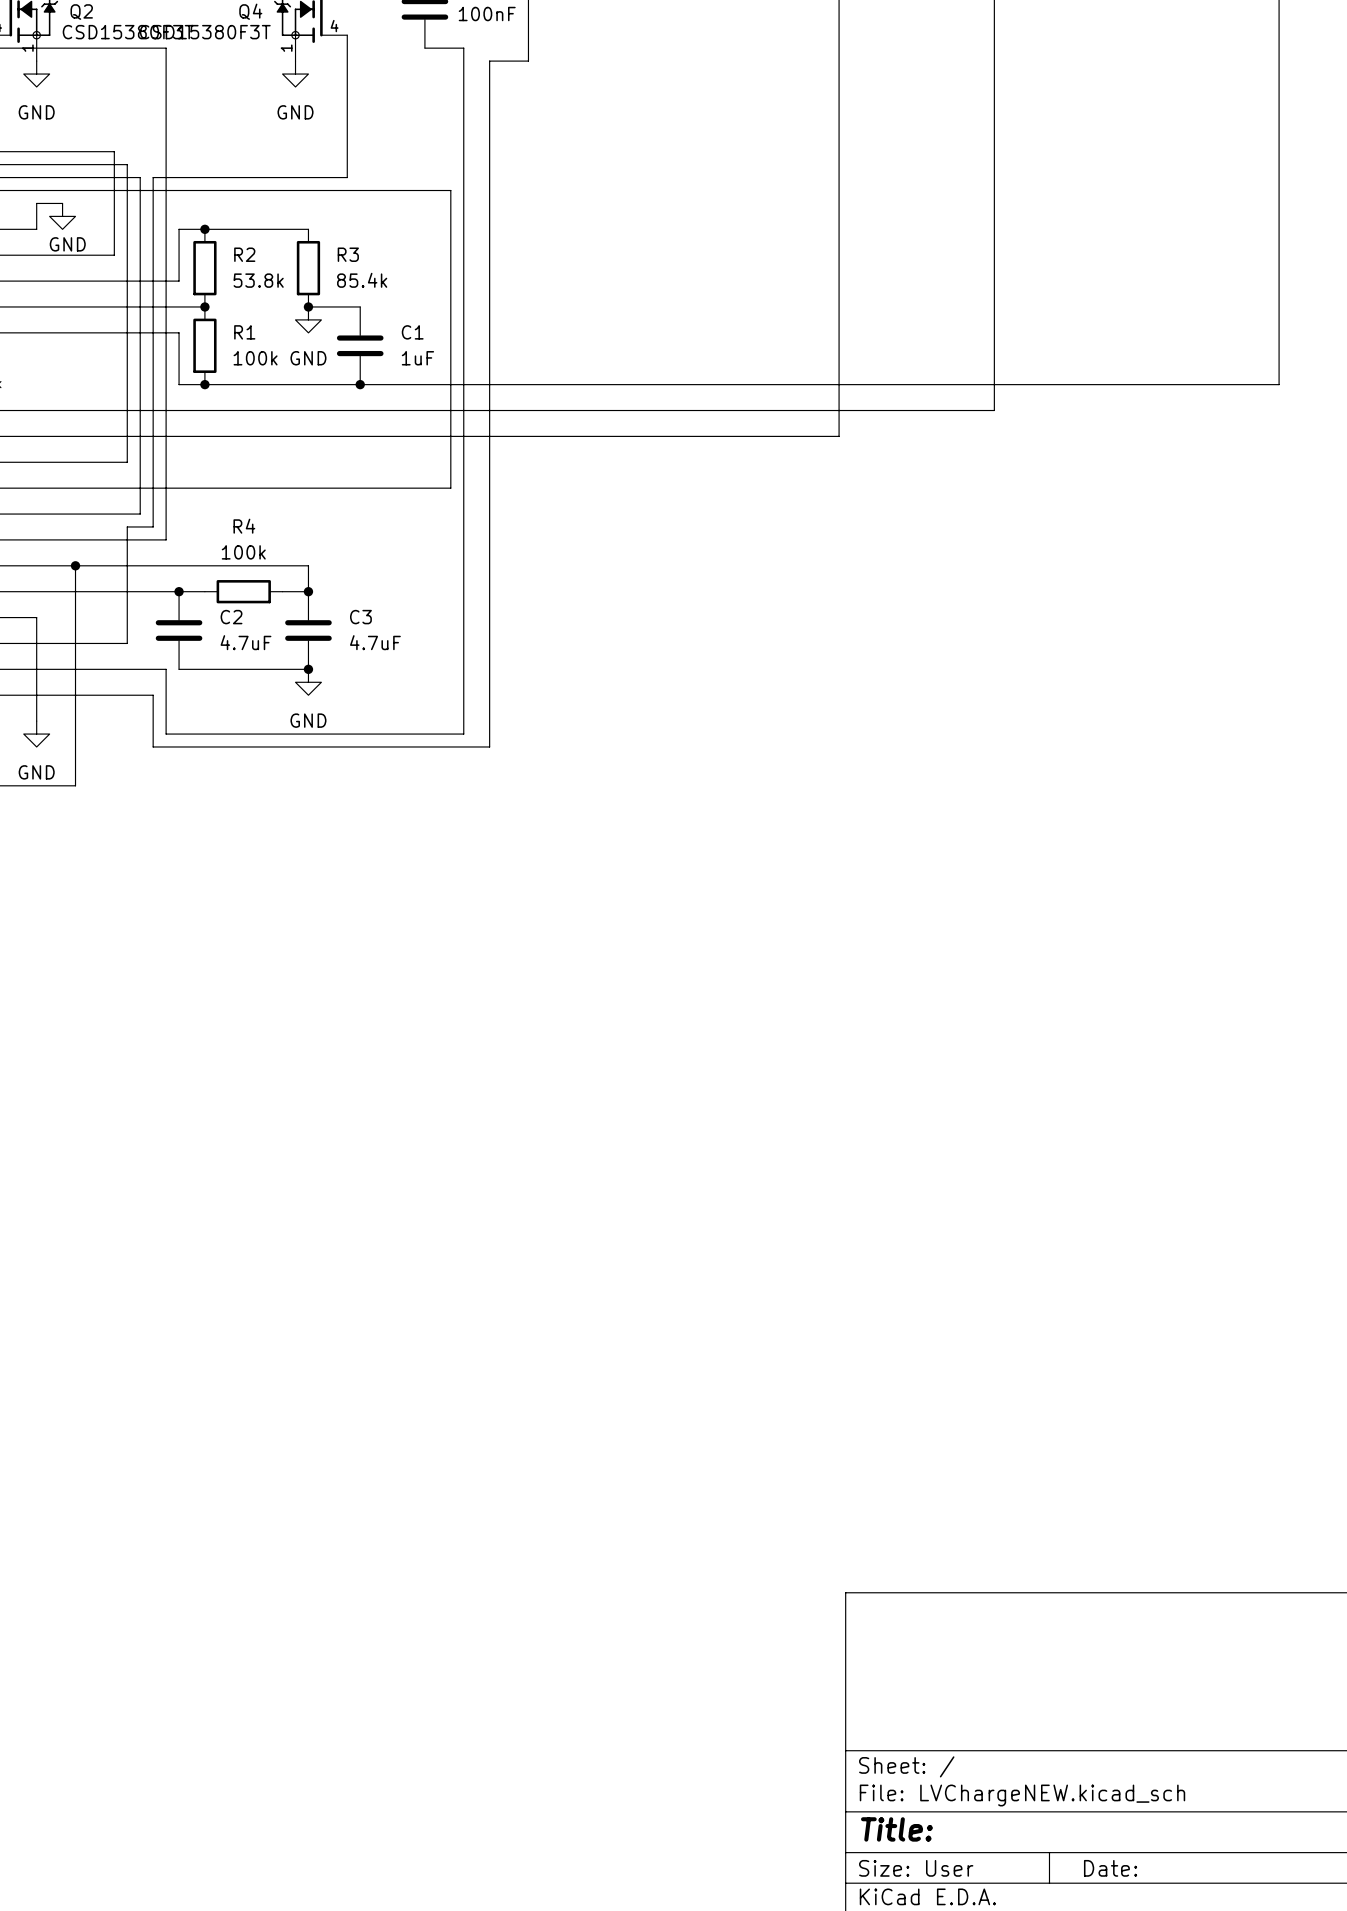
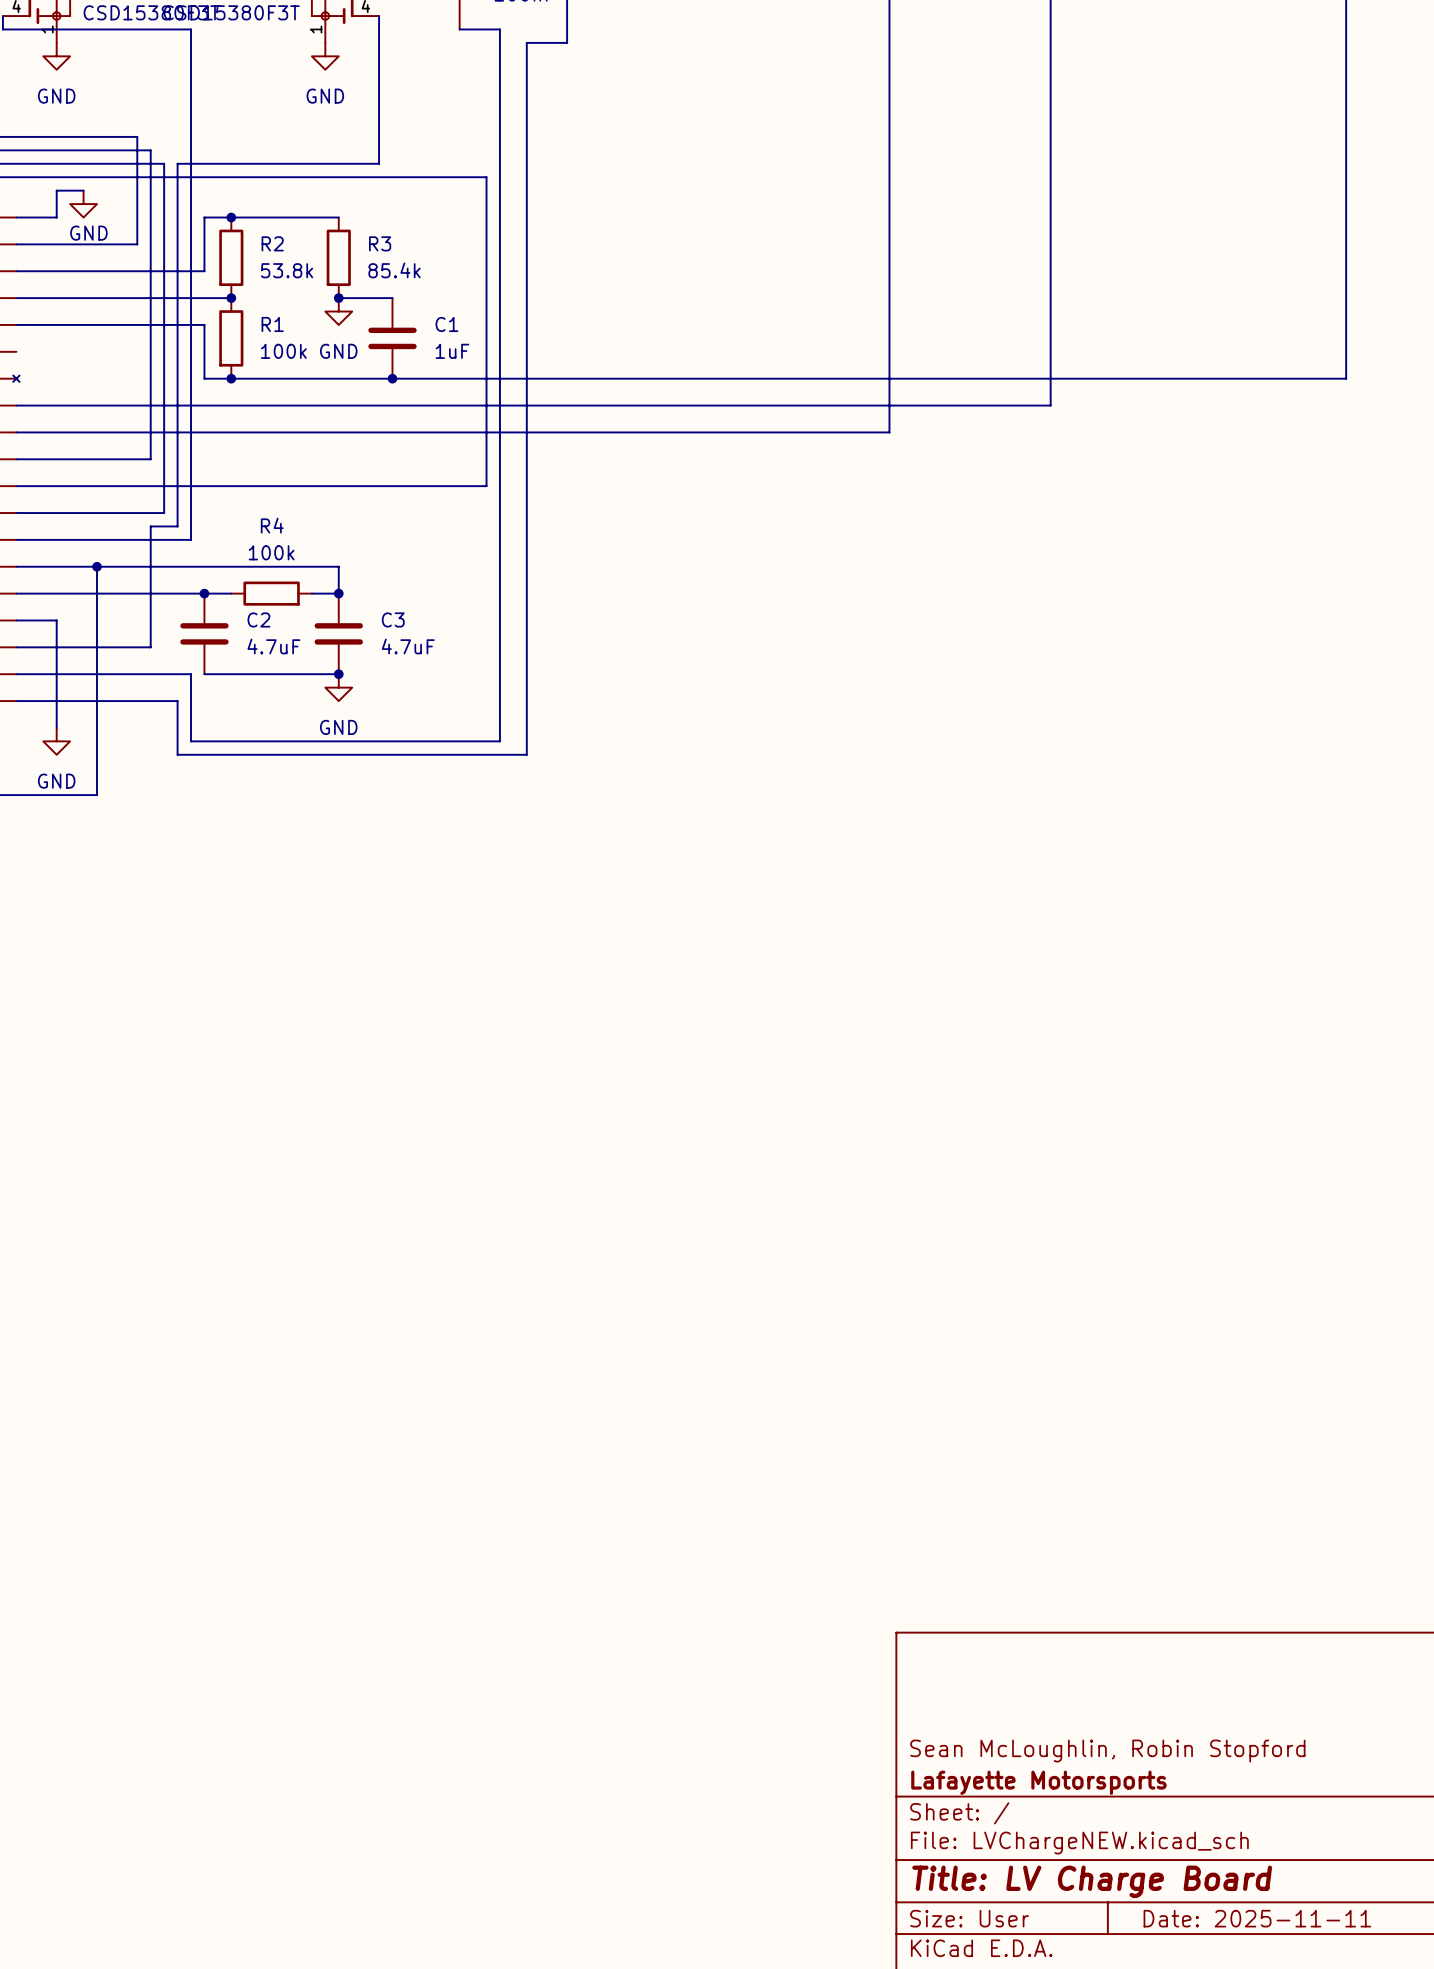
title block: none -> Sean McLoughlin, Robin Stopford (1107, 1751)
title block: none -> Lafayette Motorsports (1038, 1782)
title block: Title: (896, 1829) -> Title: LV Charge Board (1092, 1881)
title block: Date: (1110, 1868) -> Date: 2025-11-11 (1257, 1918)

